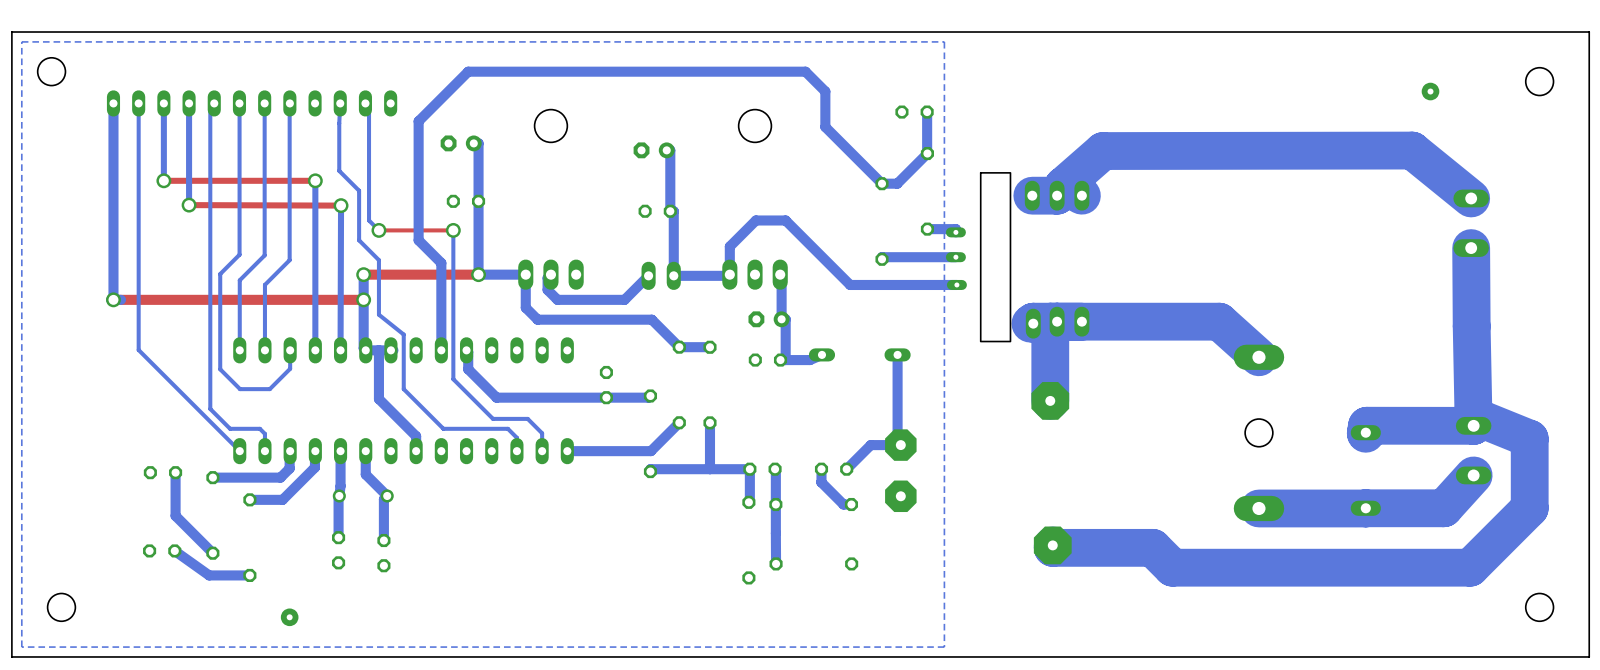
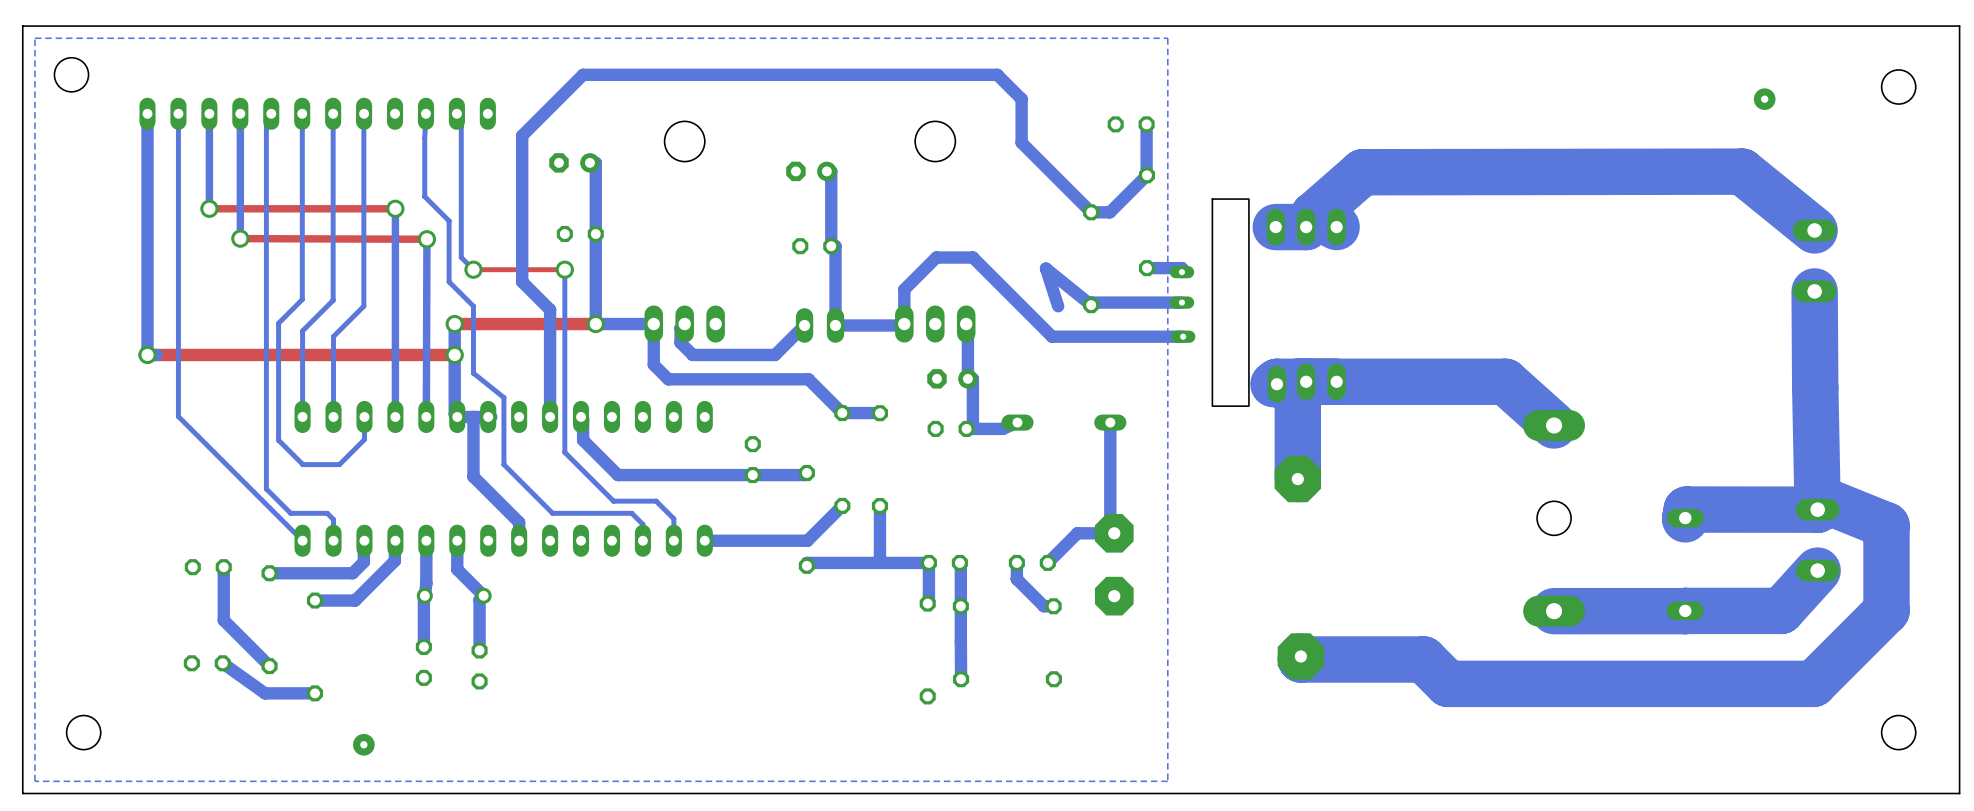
bottom track: none -> (1091, 305) (1045, 268) (1058, 306)

